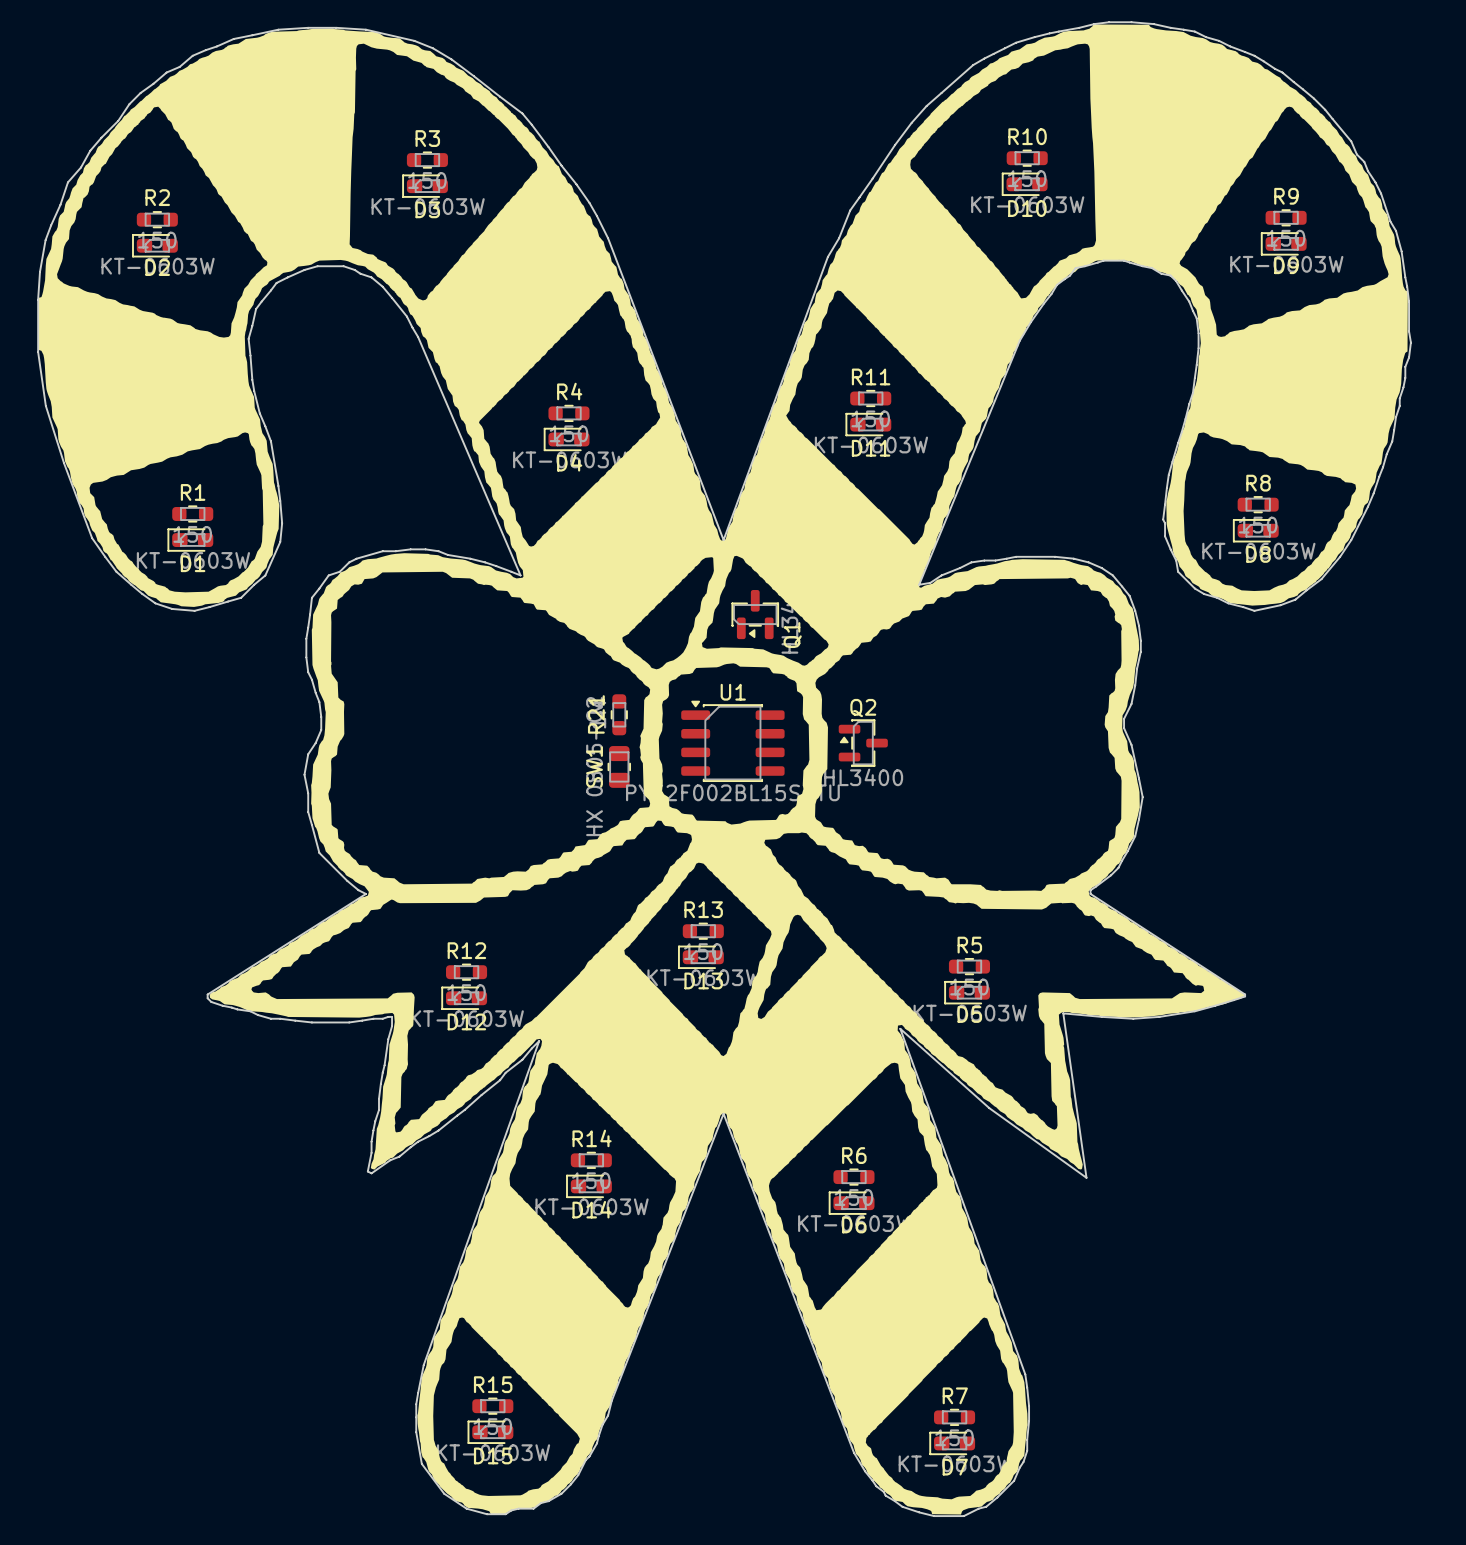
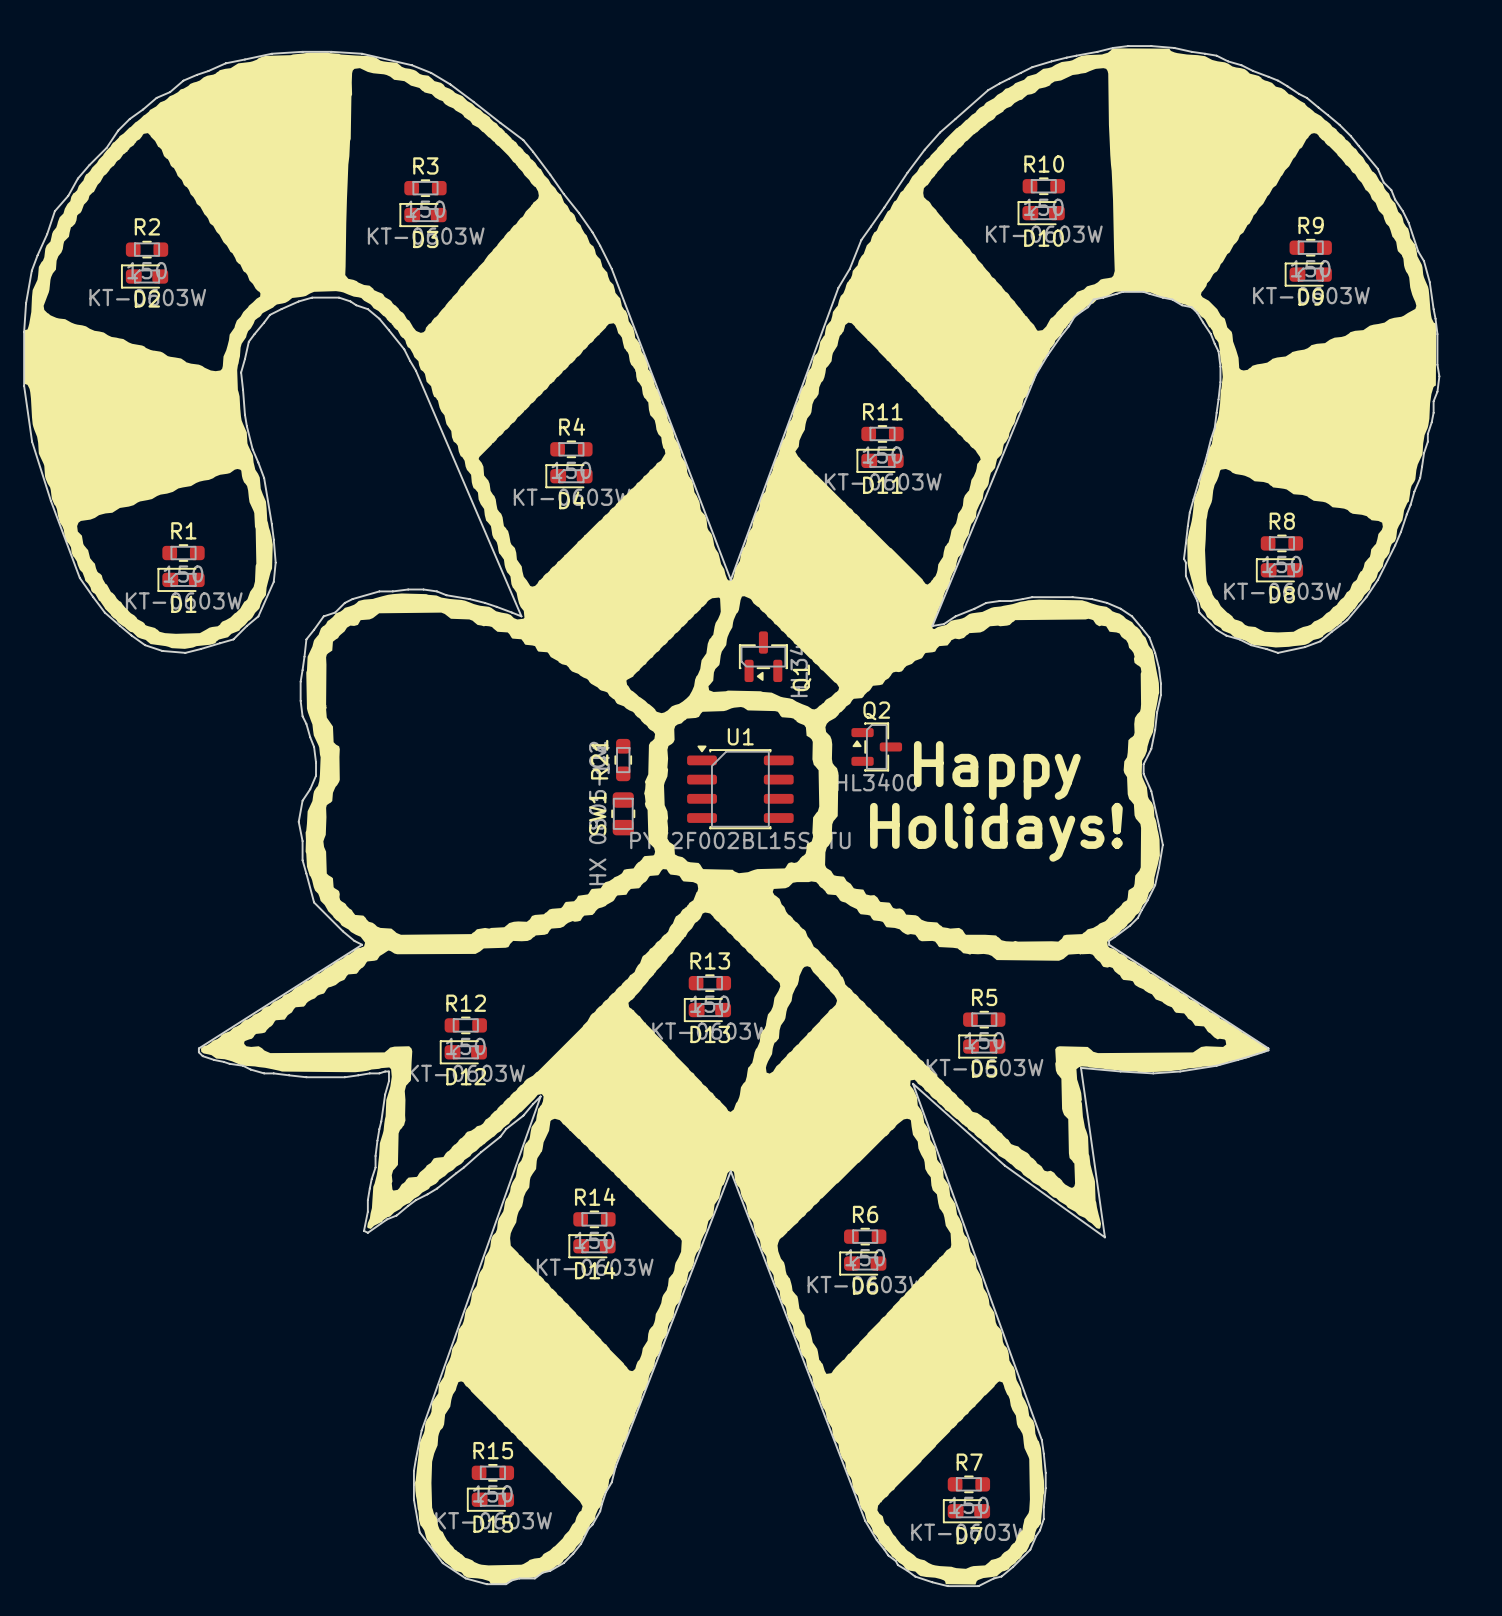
text: none -> Happy (997, 770)
Q2 position: (863, 743) -> (876, 746)
text: none -> Holidays! (996, 832)

